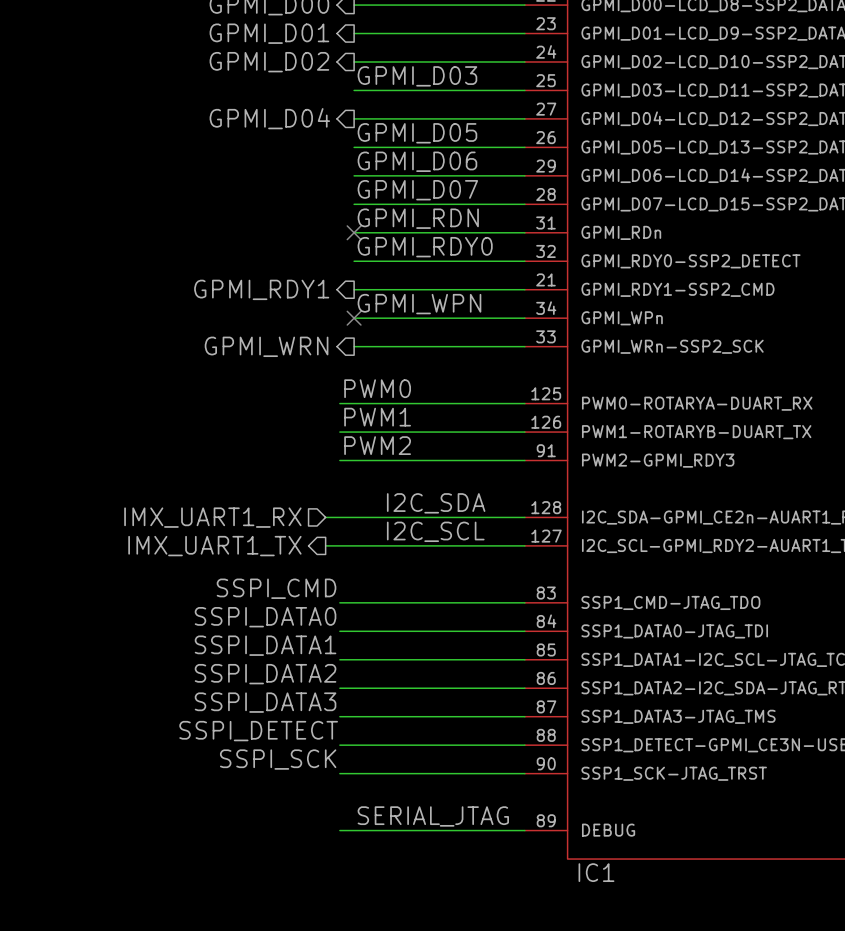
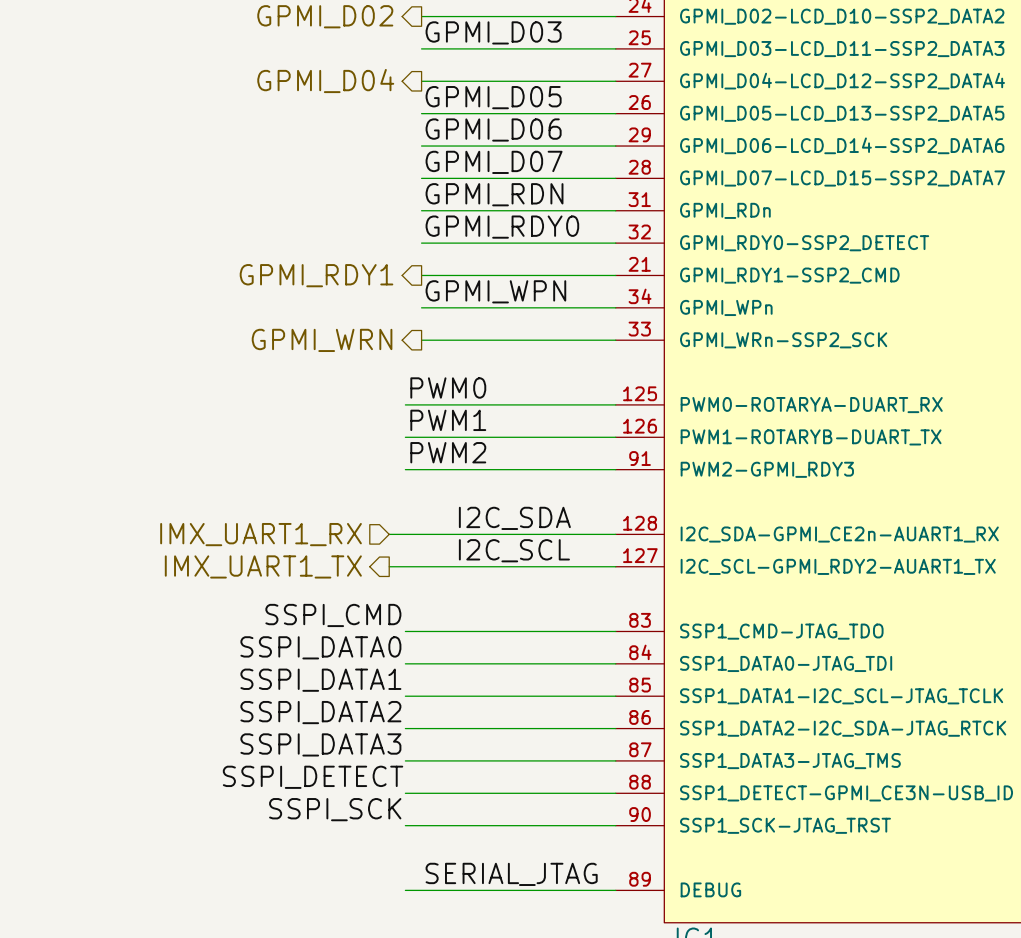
no-connect mark: (354, 232) -> none
no-connect mark: (354, 318) -> none

